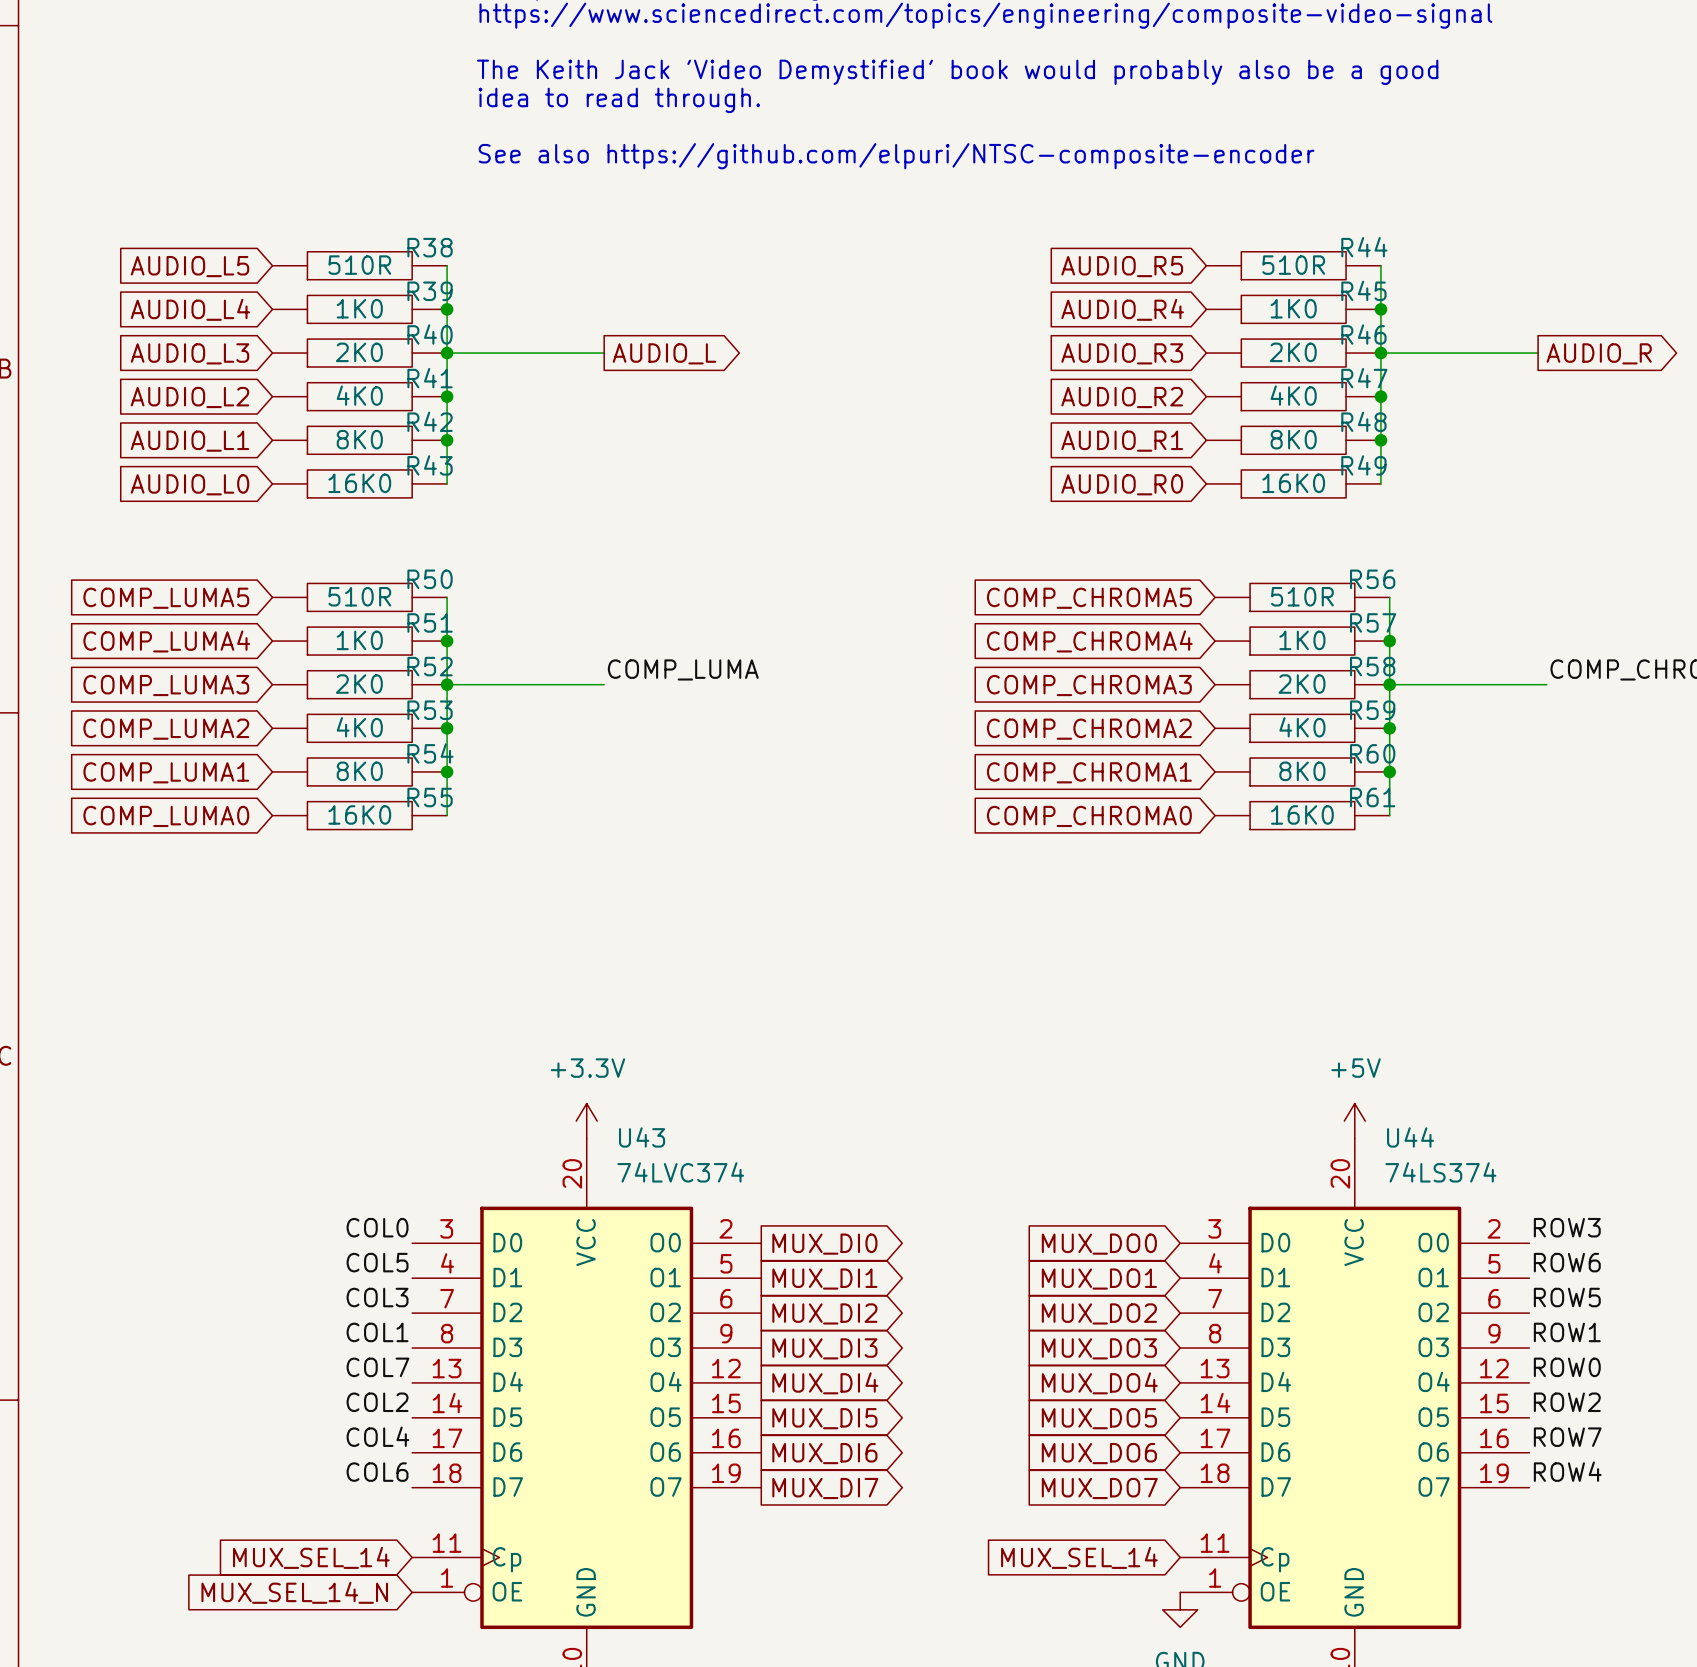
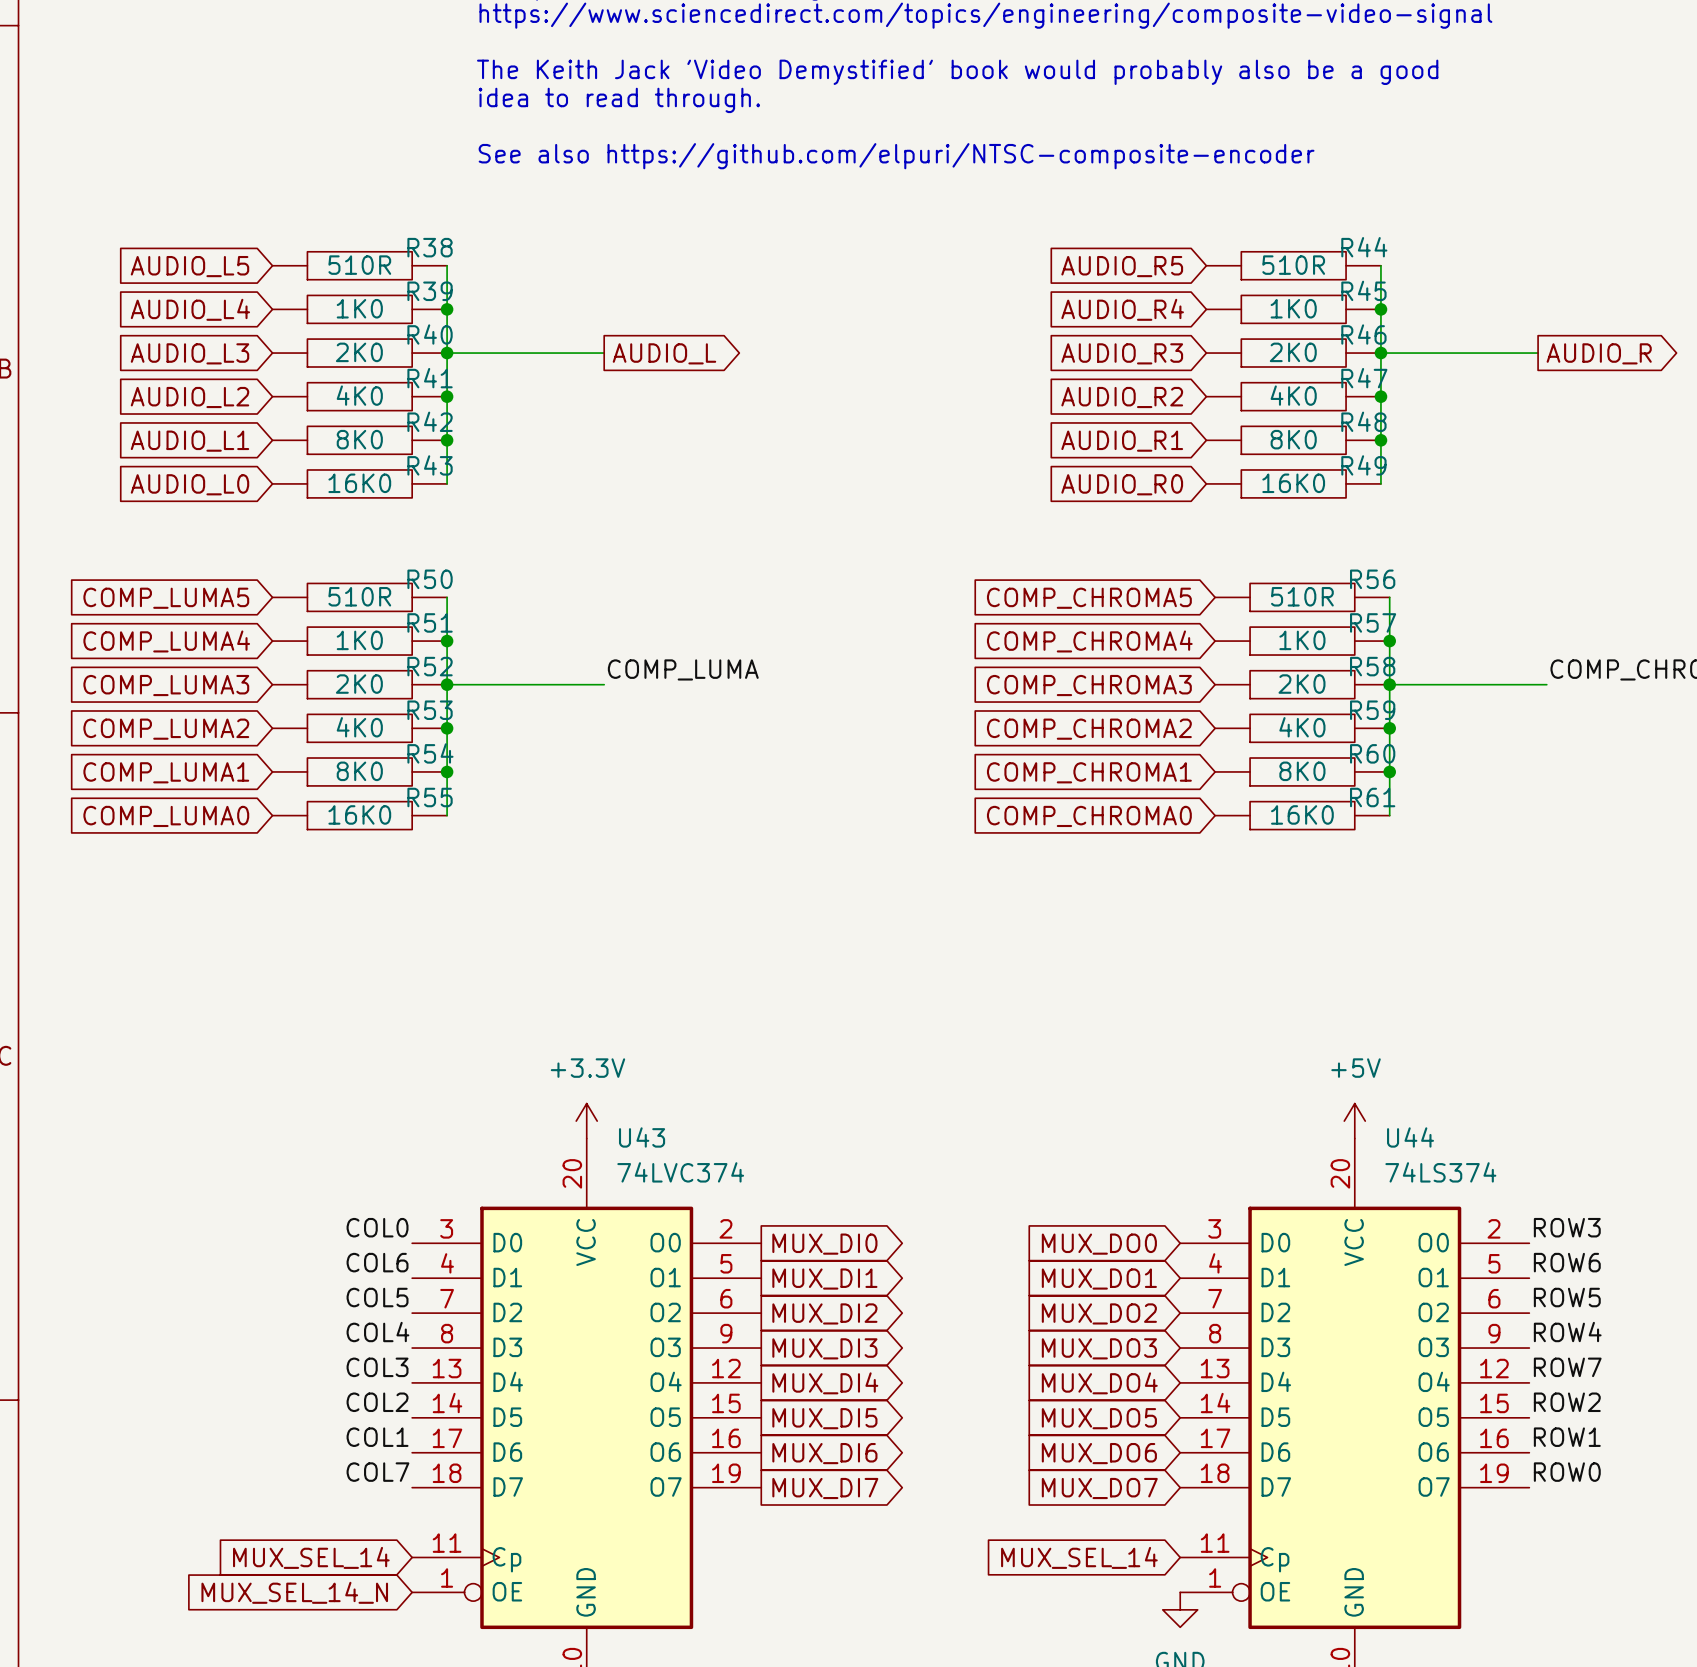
label: COL5 (377, 1262) -> COL6 (377, 1262)
label: COL3 (377, 1297) -> COL5 (377, 1297)
label: COL1 (377, 1332) -> COL4 (377, 1332)
label: ROW1 (1567, 1332) -> ROW4 (1567, 1332)
label: COL7 (377, 1367) -> COL3 (377, 1367)
label: ROW0 (1567, 1367) -> ROW7 (1567, 1367)
label: COL4 (377, 1436) -> COL1 (377, 1437)
label: ROW7 (1567, 1437) -> ROW1 (1567, 1437)
label: ROW4 (1567, 1471) -> ROW0 (1567, 1472)
label: COL6 (377, 1472) -> COL7 (377, 1472)

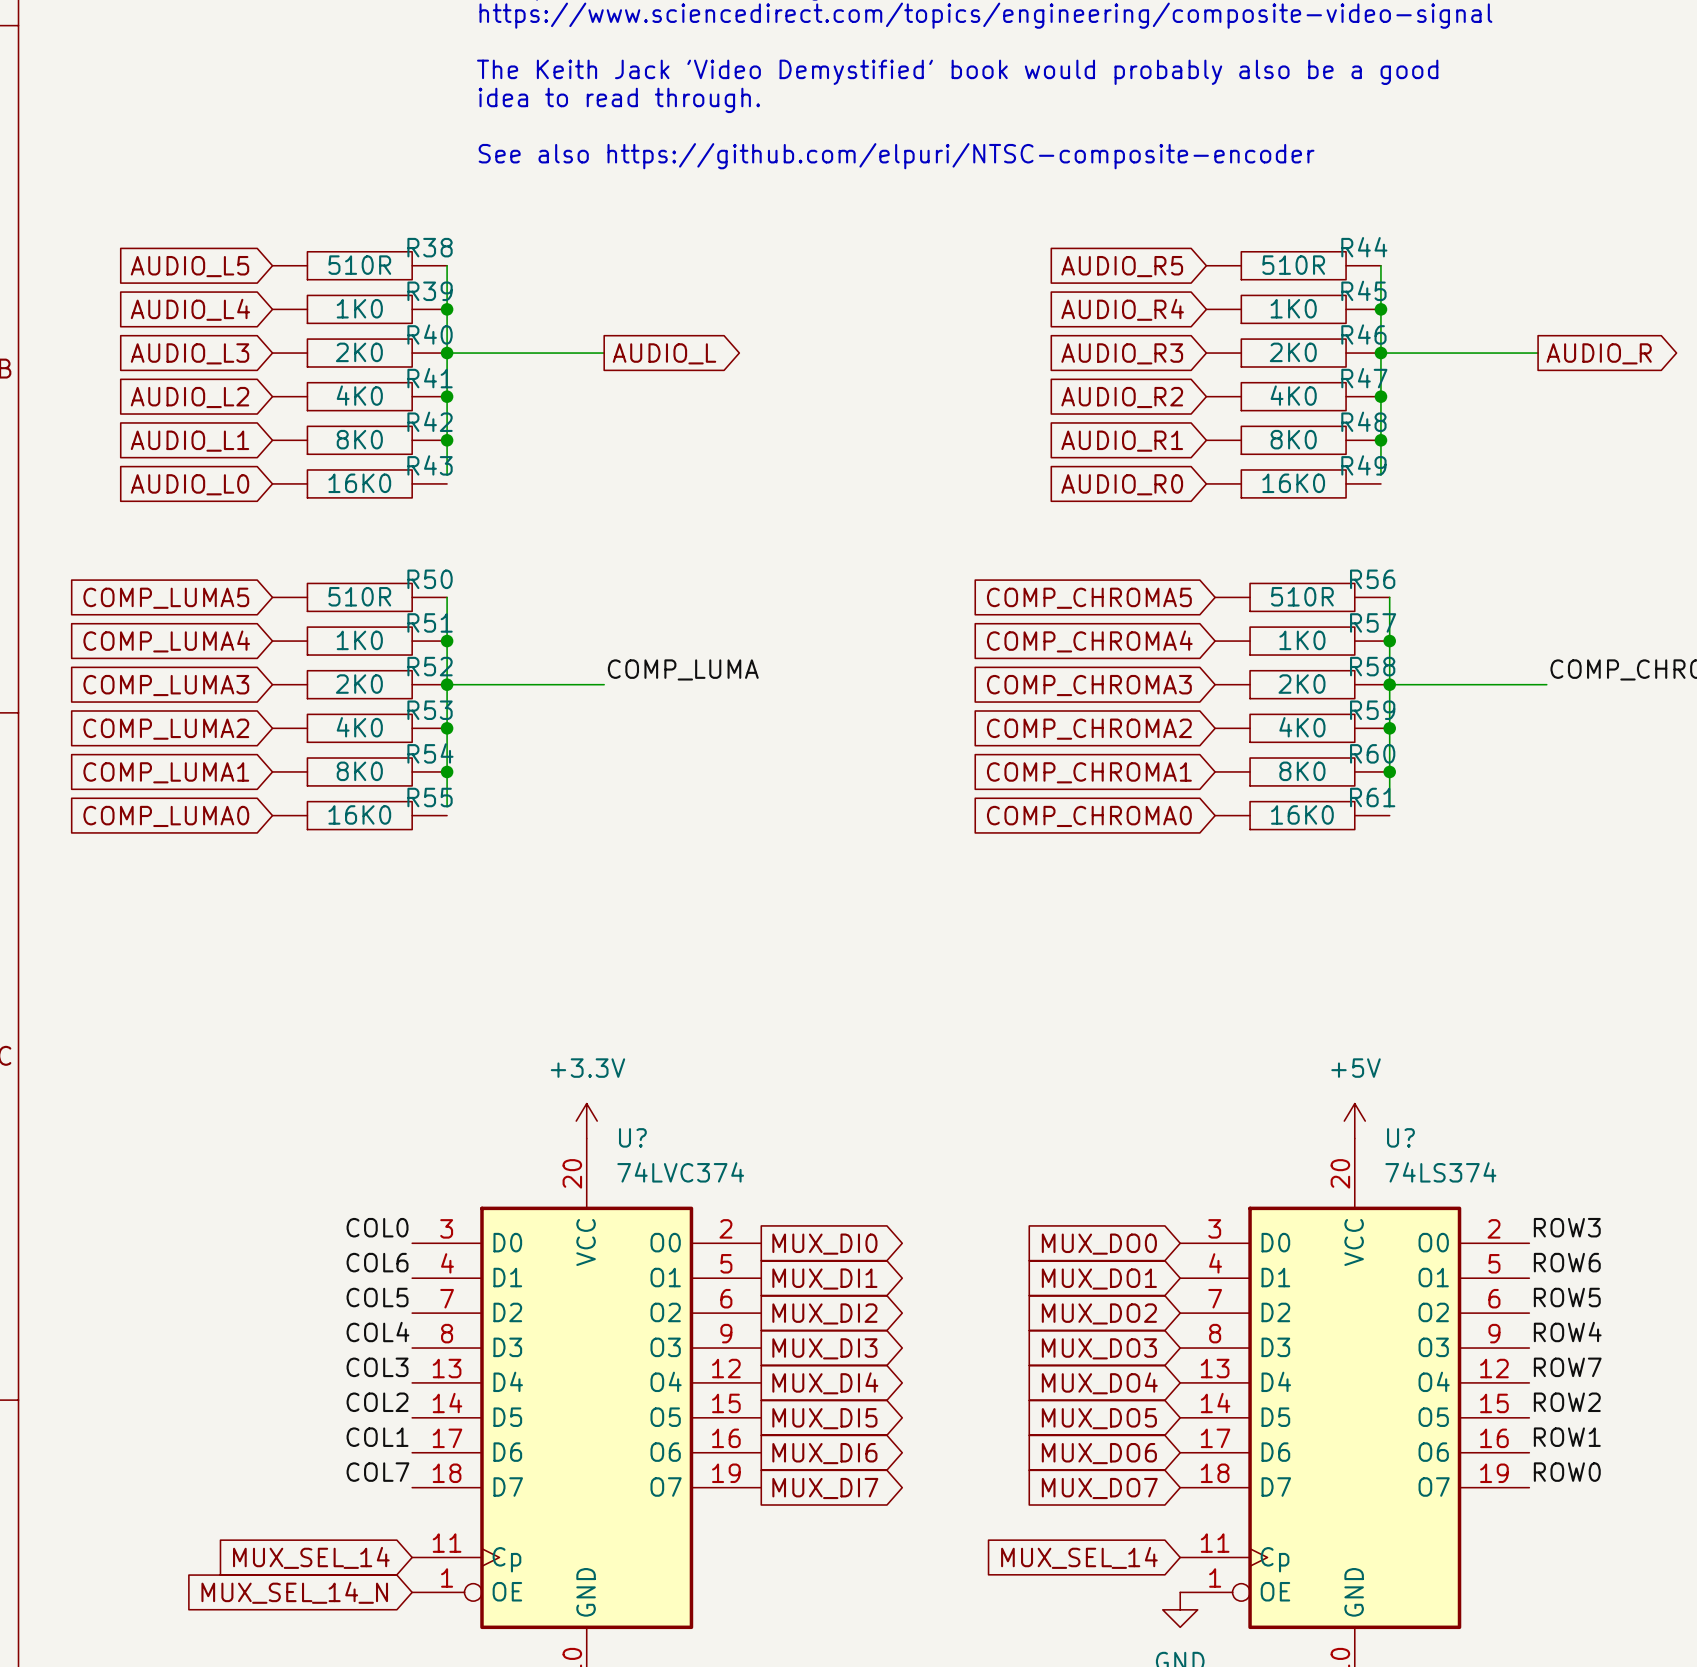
wire: (447, 475) (447, 483) -> none
wire: (1380, 475) (1380, 483) -> none
wire: (447, 806) (447, 815) -> none
wire: (1389, 806) (1389, 815) -> none
U43 name: U43 (642, 1137) -> U? (632, 1137)
U44 name: U44 (1410, 1137) -> U? (1400, 1137)

